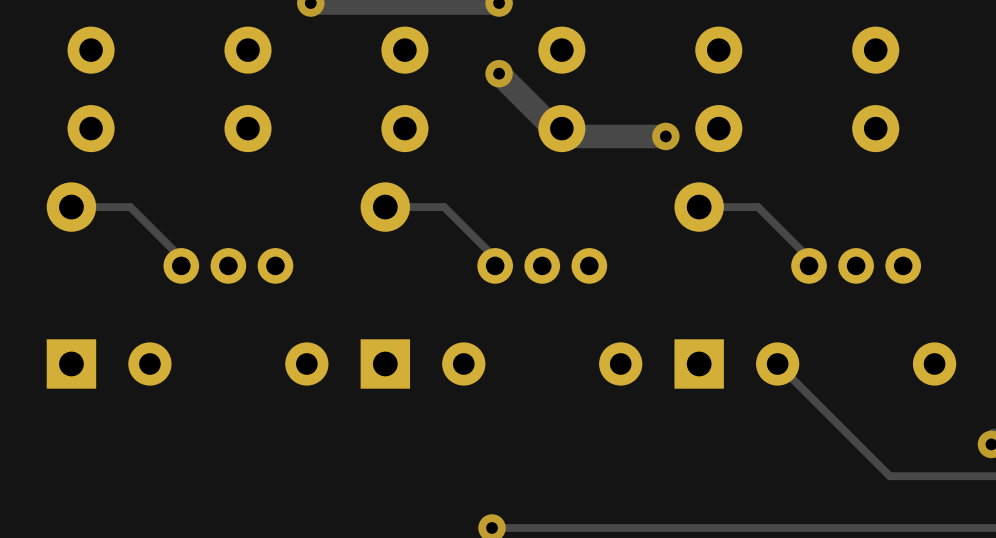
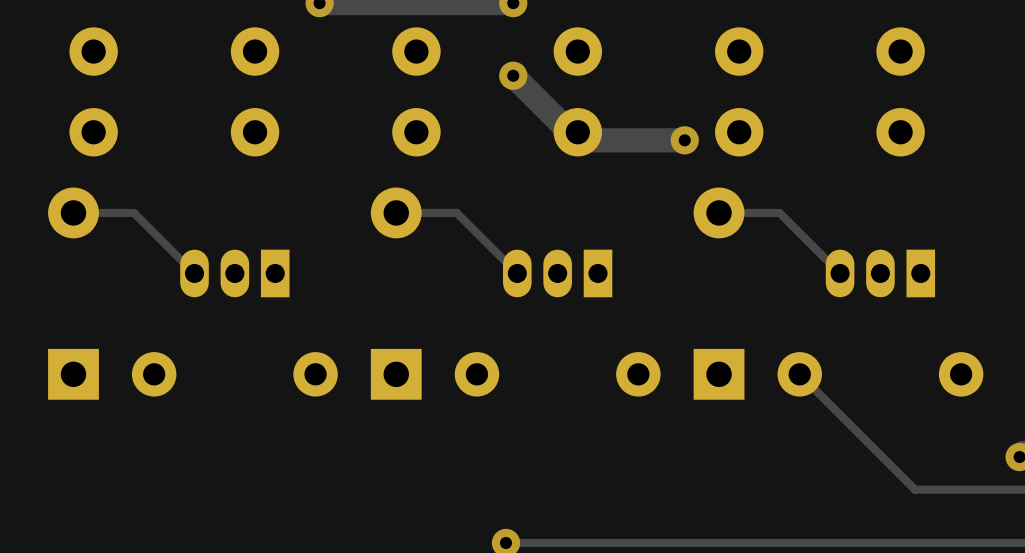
part footprint: [163, 248, 294, 284] -> [180, 249, 290, 298]
part footprint: [477, 248, 608, 284] -> [503, 249, 613, 298]
part footprint: [791, 248, 922, 284] -> [825, 249, 936, 298]

